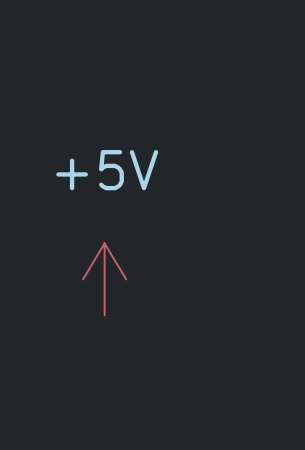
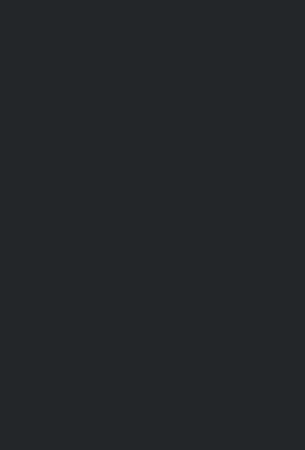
power symbol: +5V (104, 279) -> none

